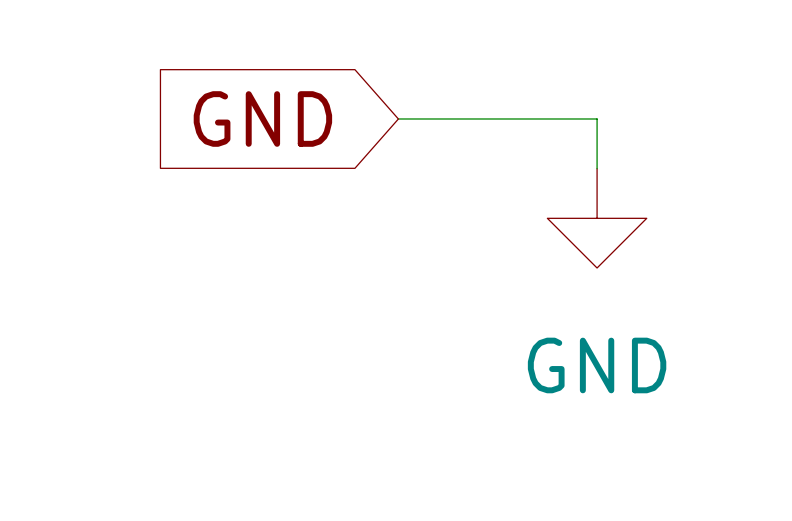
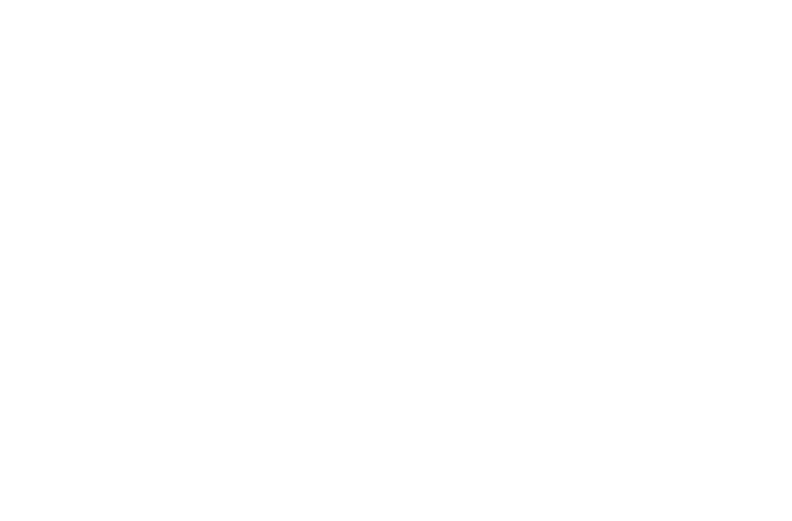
global label: GND (262, 118) -> none
wire: (398, 118) (597, 118) (597, 168) -> none
power symbol: GND (597, 218) -> none

